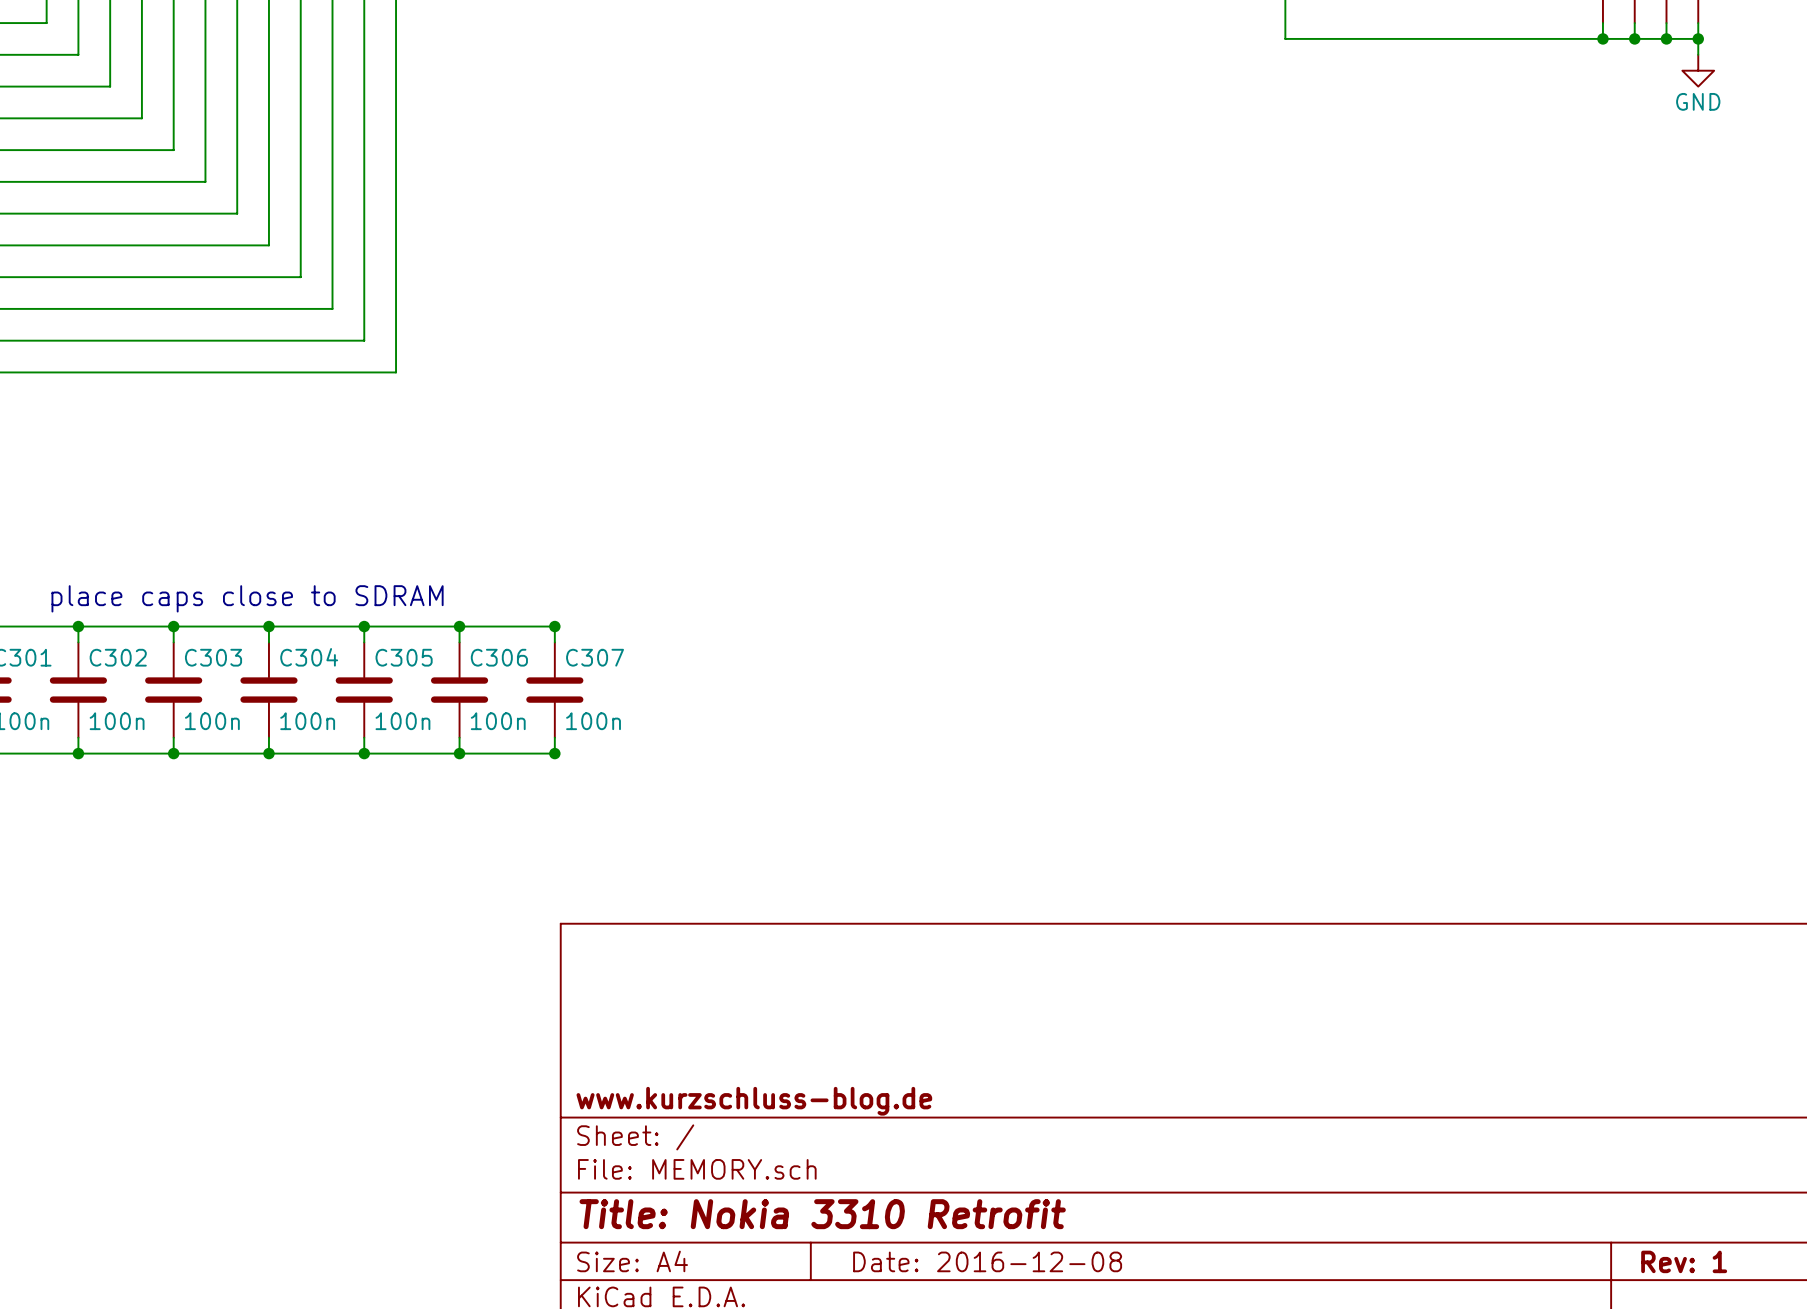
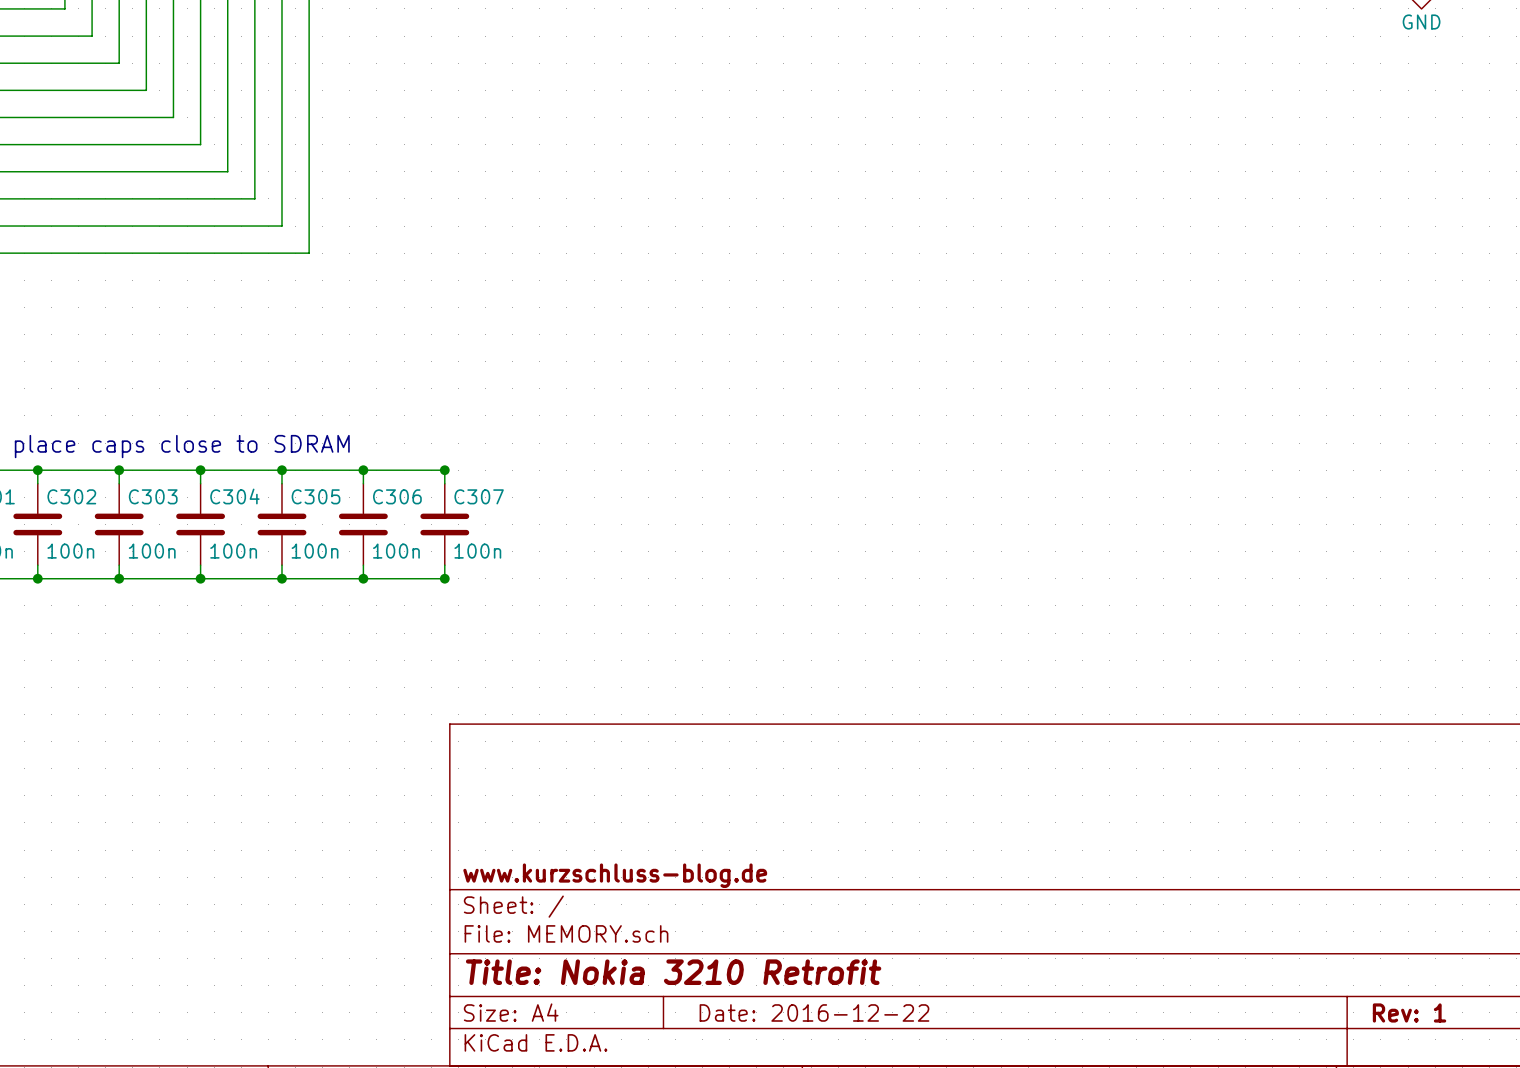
title block: Title: Nokia 3310 Retrofit (822, 1214) -> Title: Nokia 3210 Retrofit (673, 972)
title block: Date: 2016-12-08 (987, 1261) -> Date: 2016-12-22 (814, 1012)

